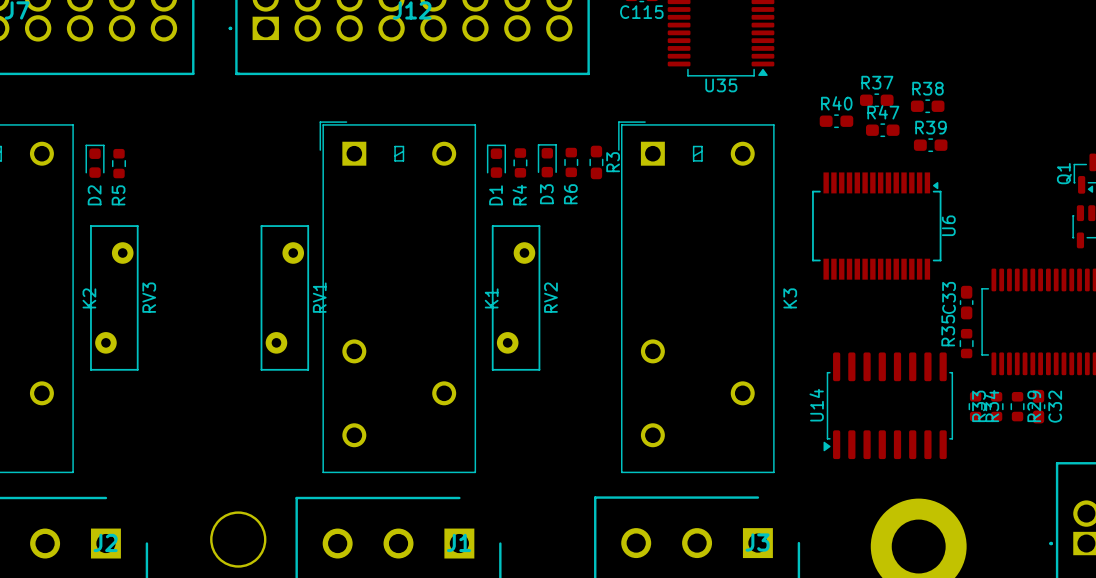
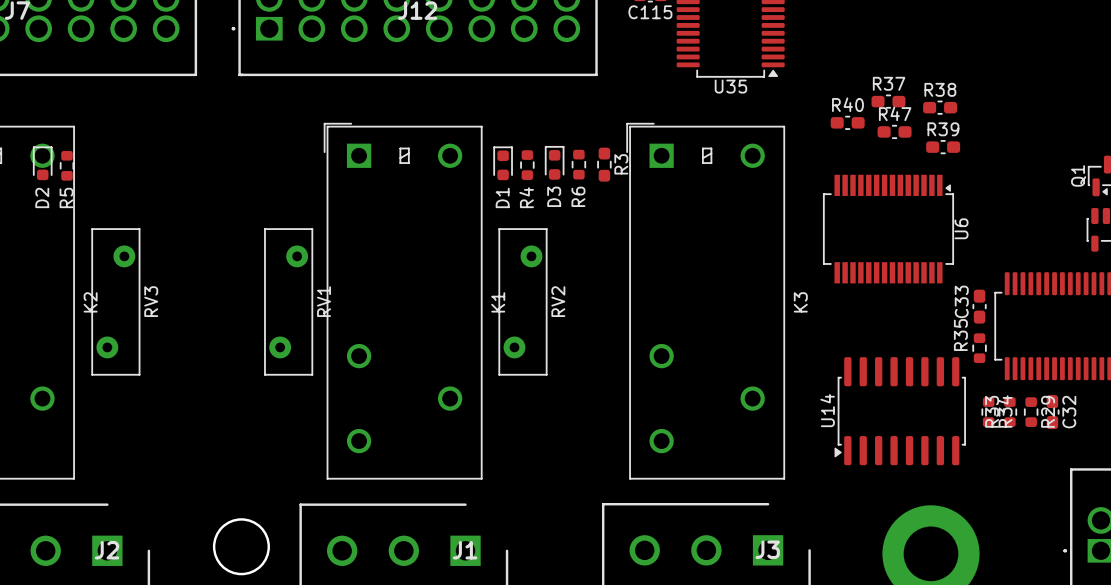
D2 position: (95, 161) -> (42, 163)
R5 position: (119, 163) -> (67, 165)

